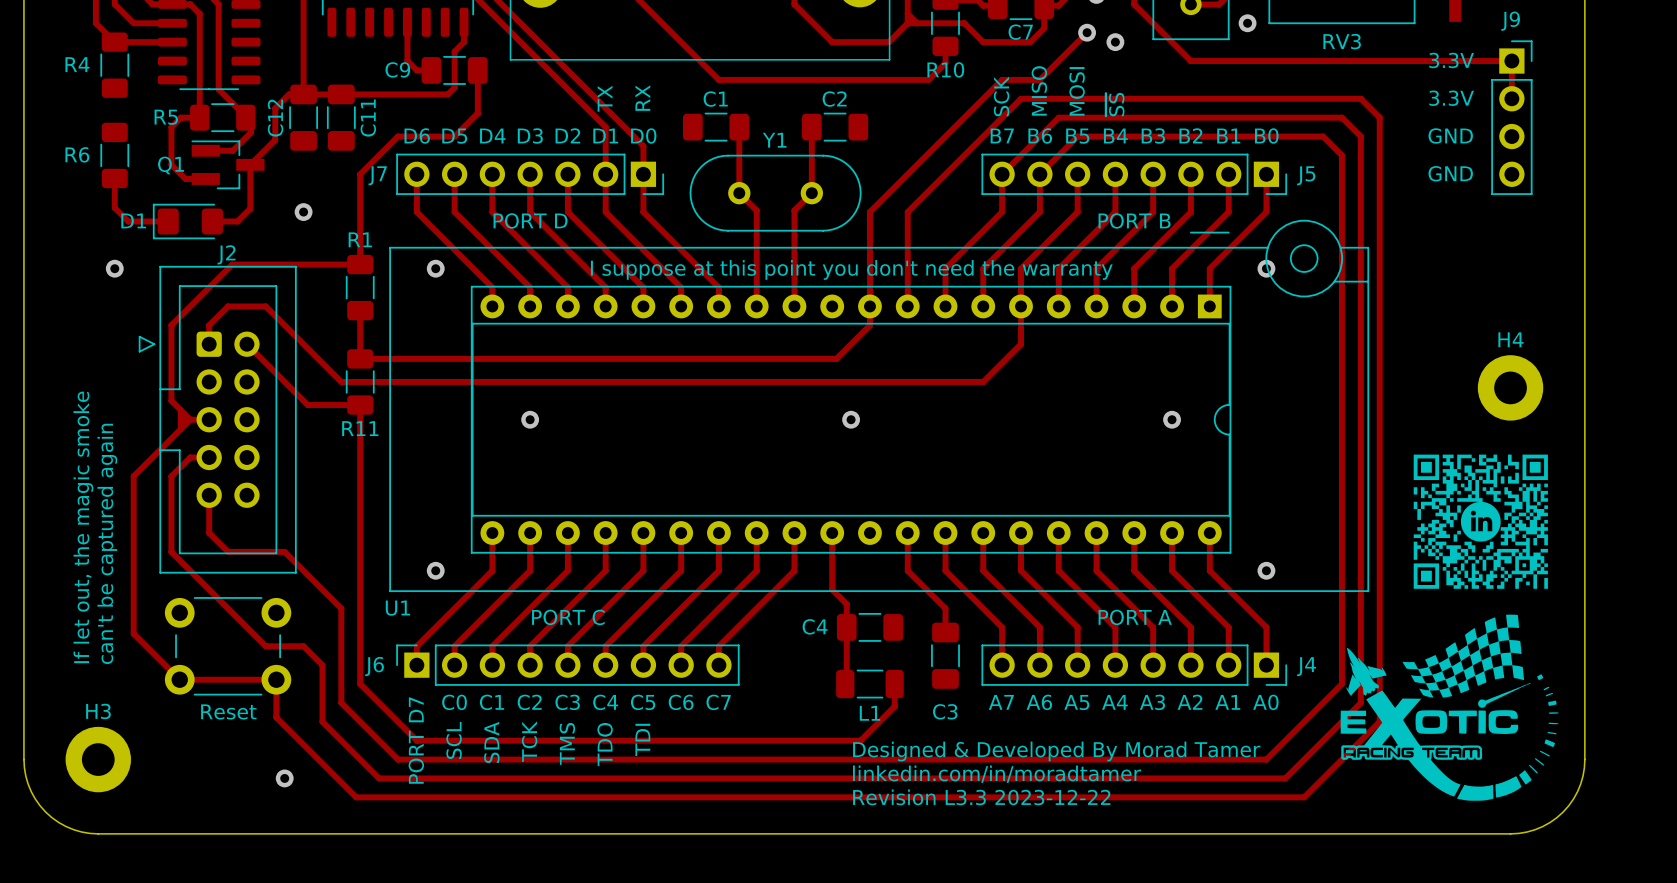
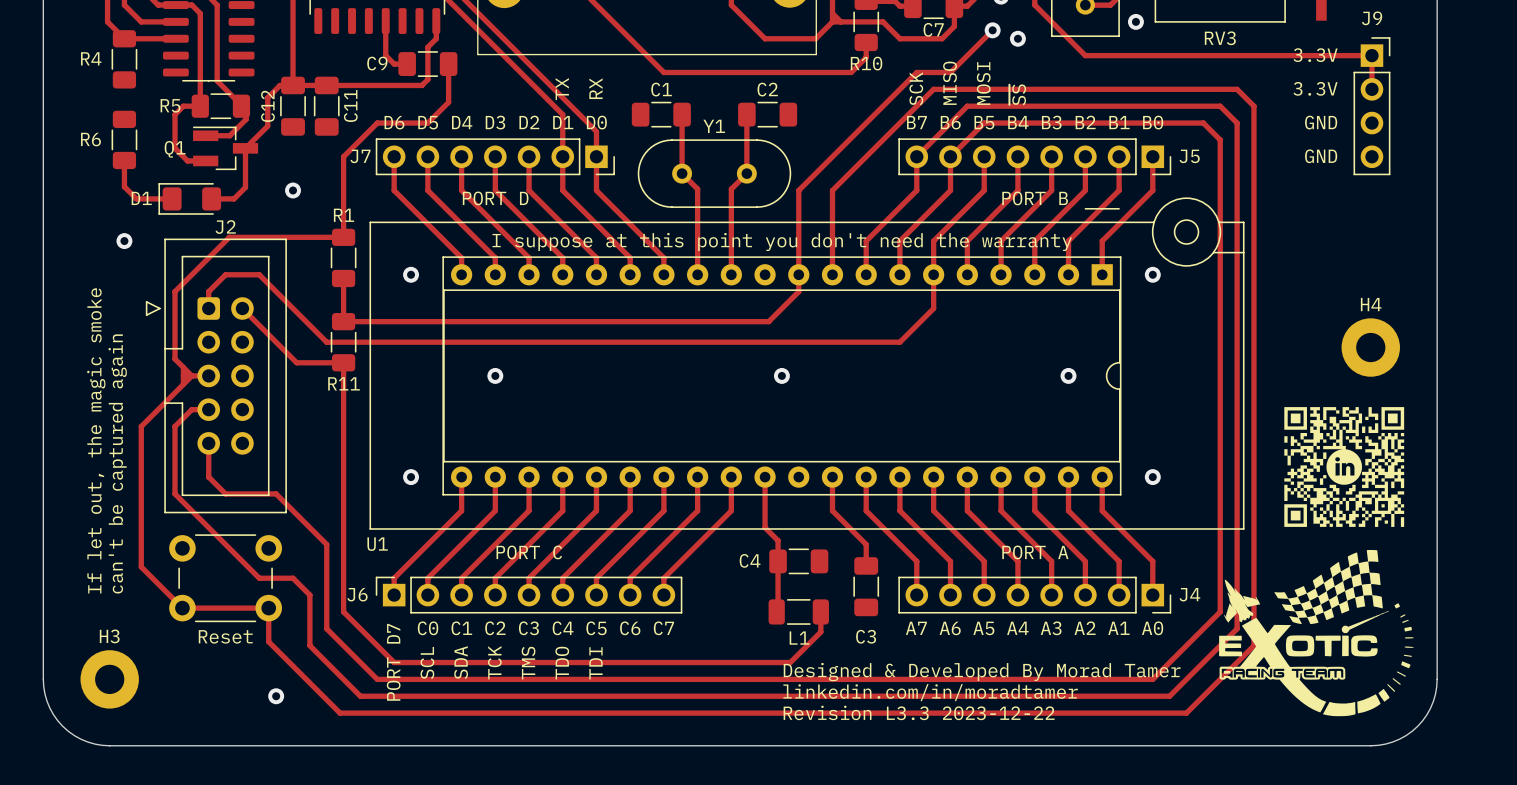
via position: (435, 268) -> (411, 274)
via position: (1266, 268) -> (1152, 274)
via position: (435, 570) -> (411, 477)
via position: (1266, 570) -> (1152, 477)

